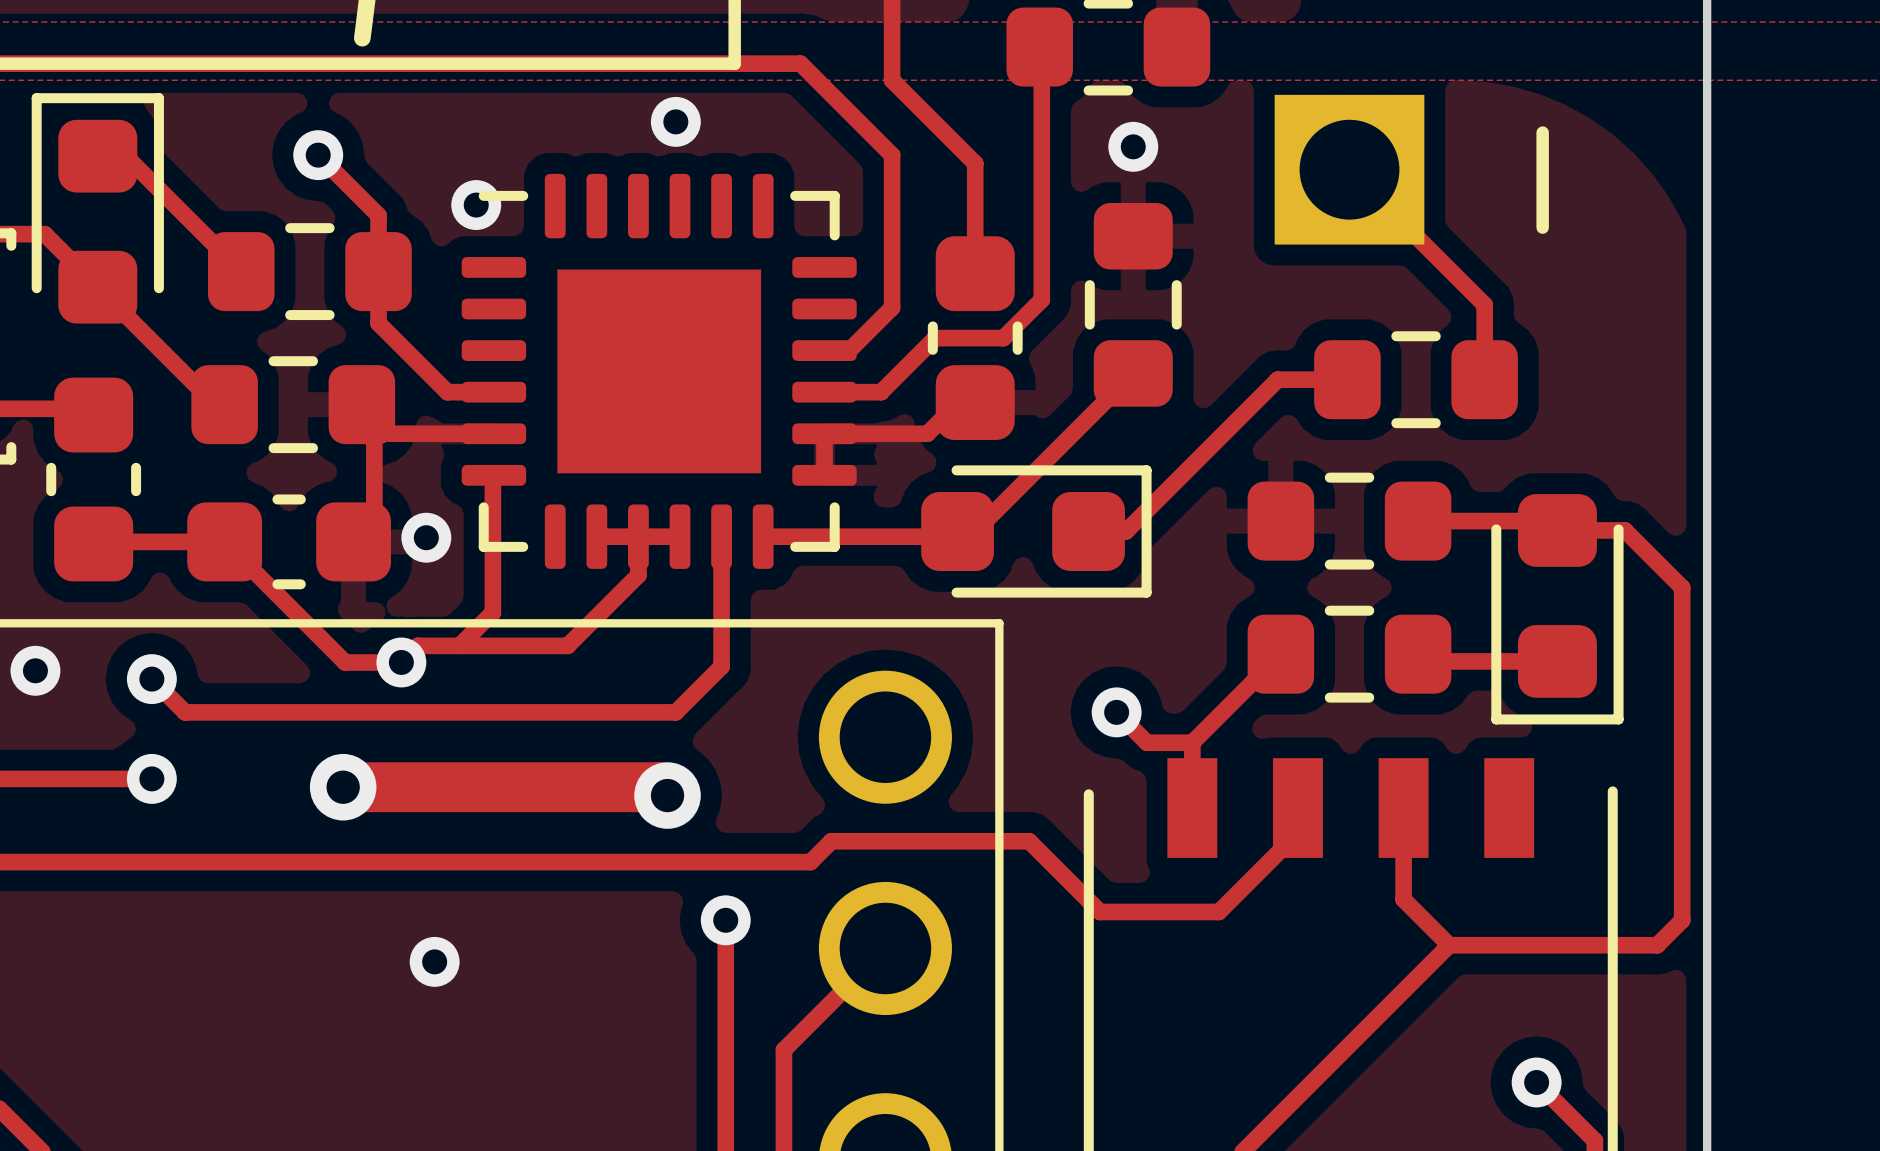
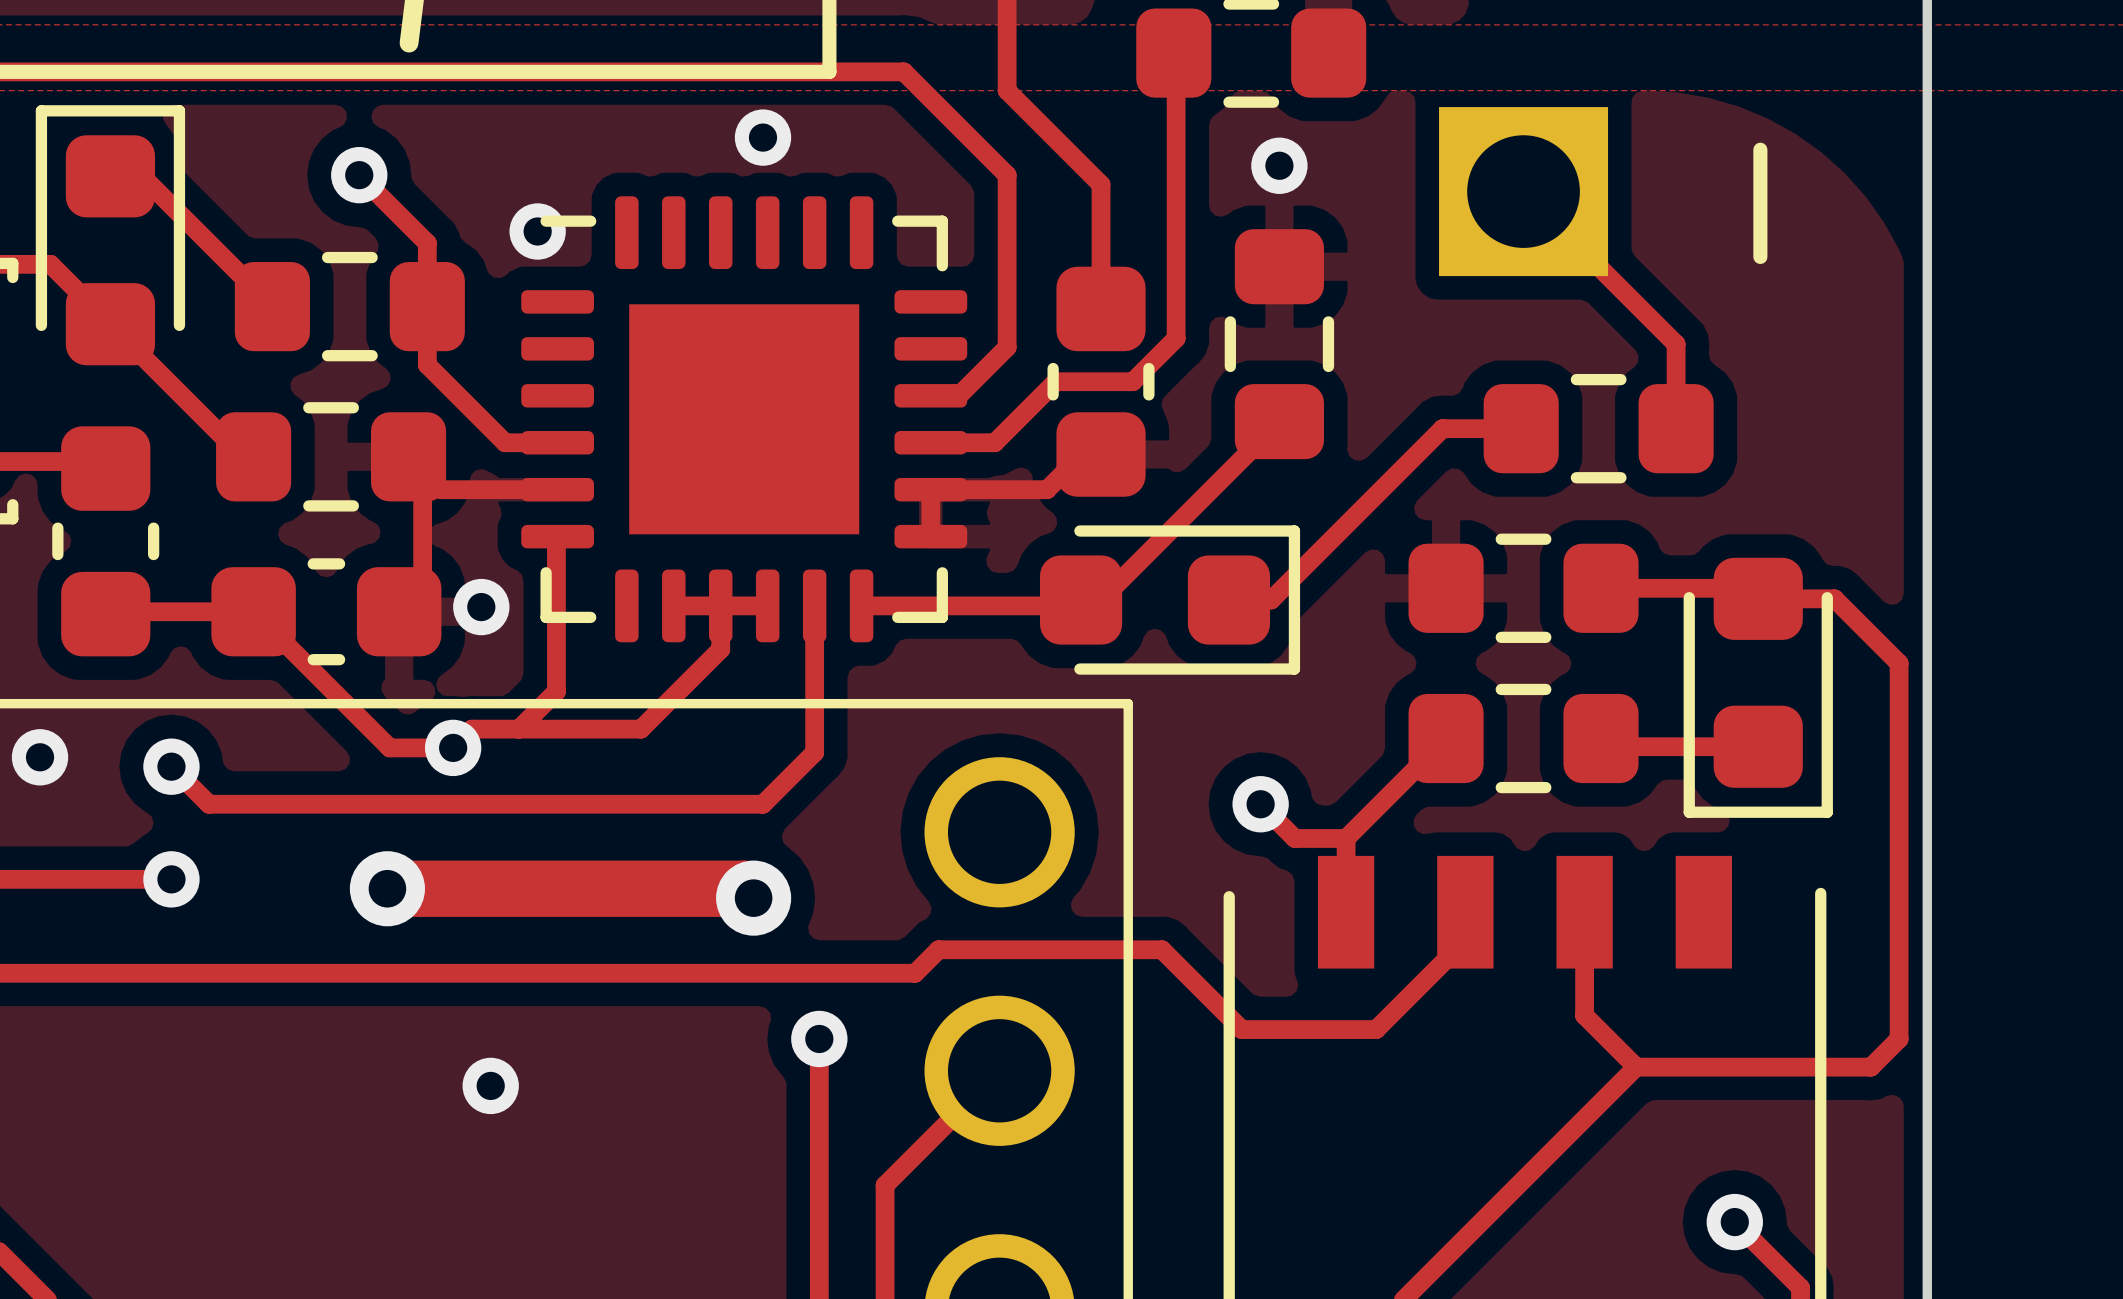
text position: - (1542, 180) -> - (1760, 203)

